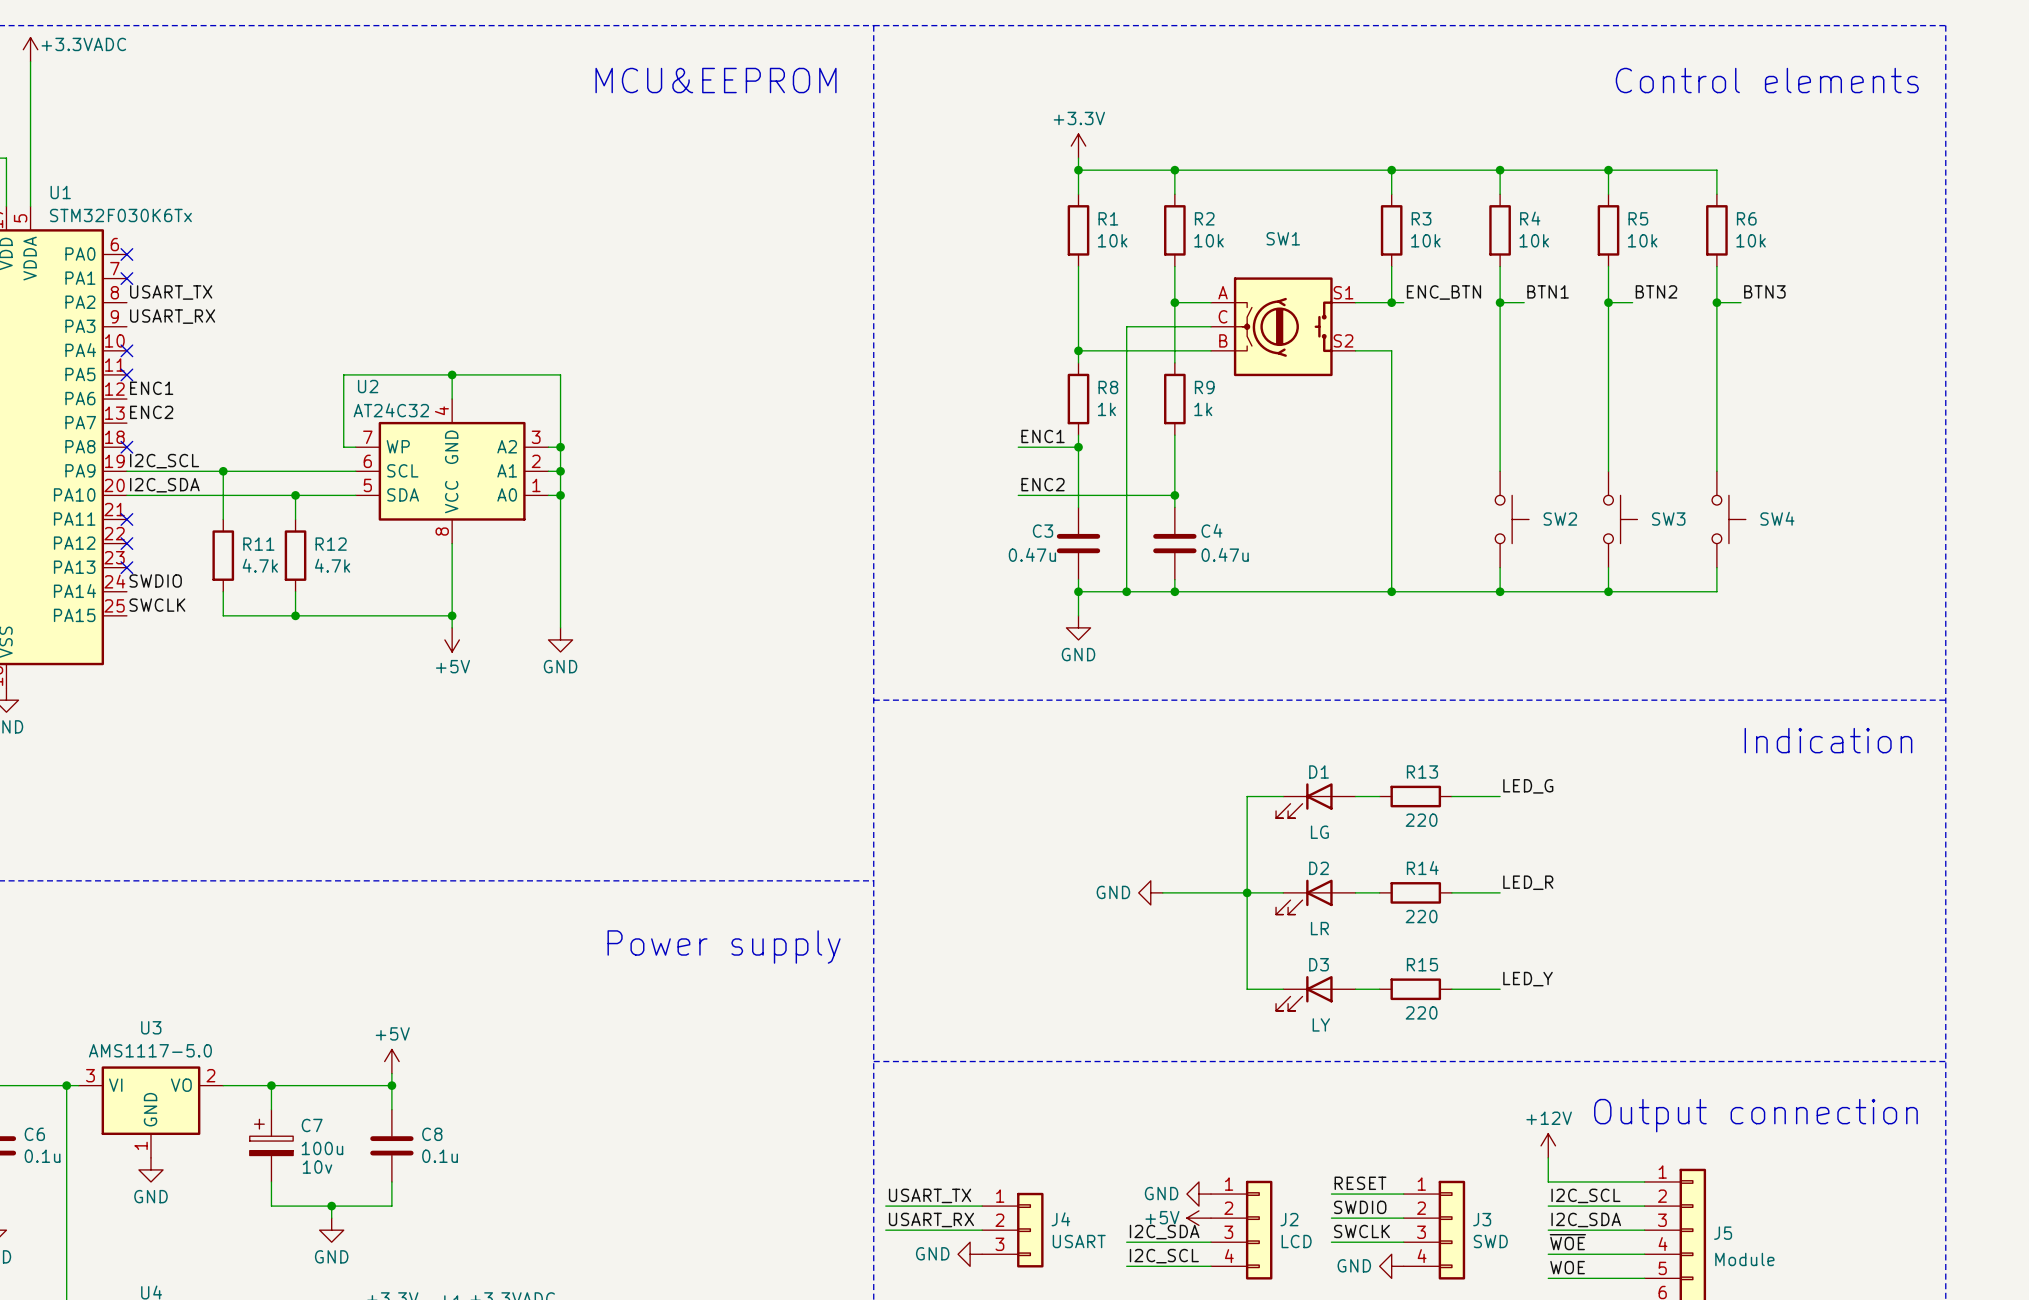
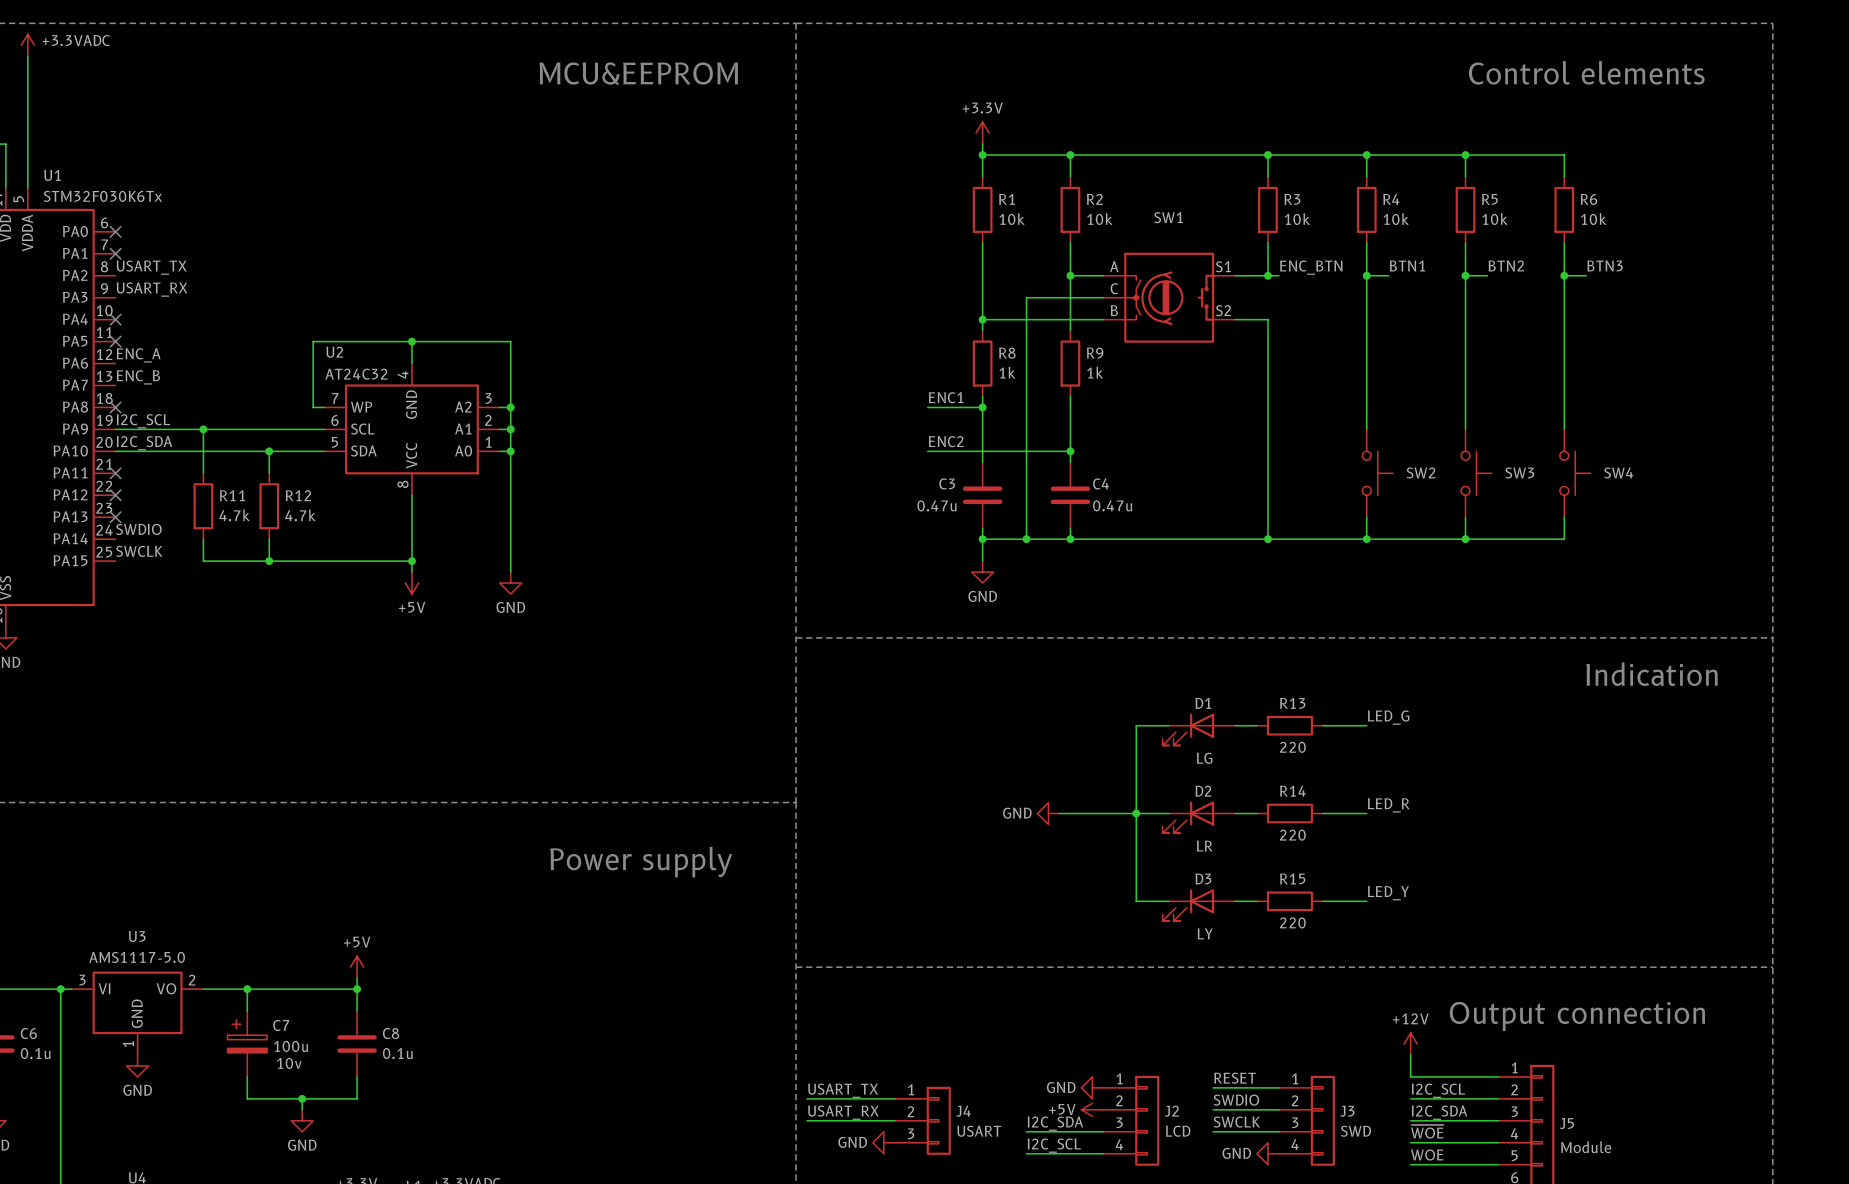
label: ENC1 (151, 388) -> ENC_A (138, 355)
label: ENC2 (151, 412) -> ENC_B (138, 377)

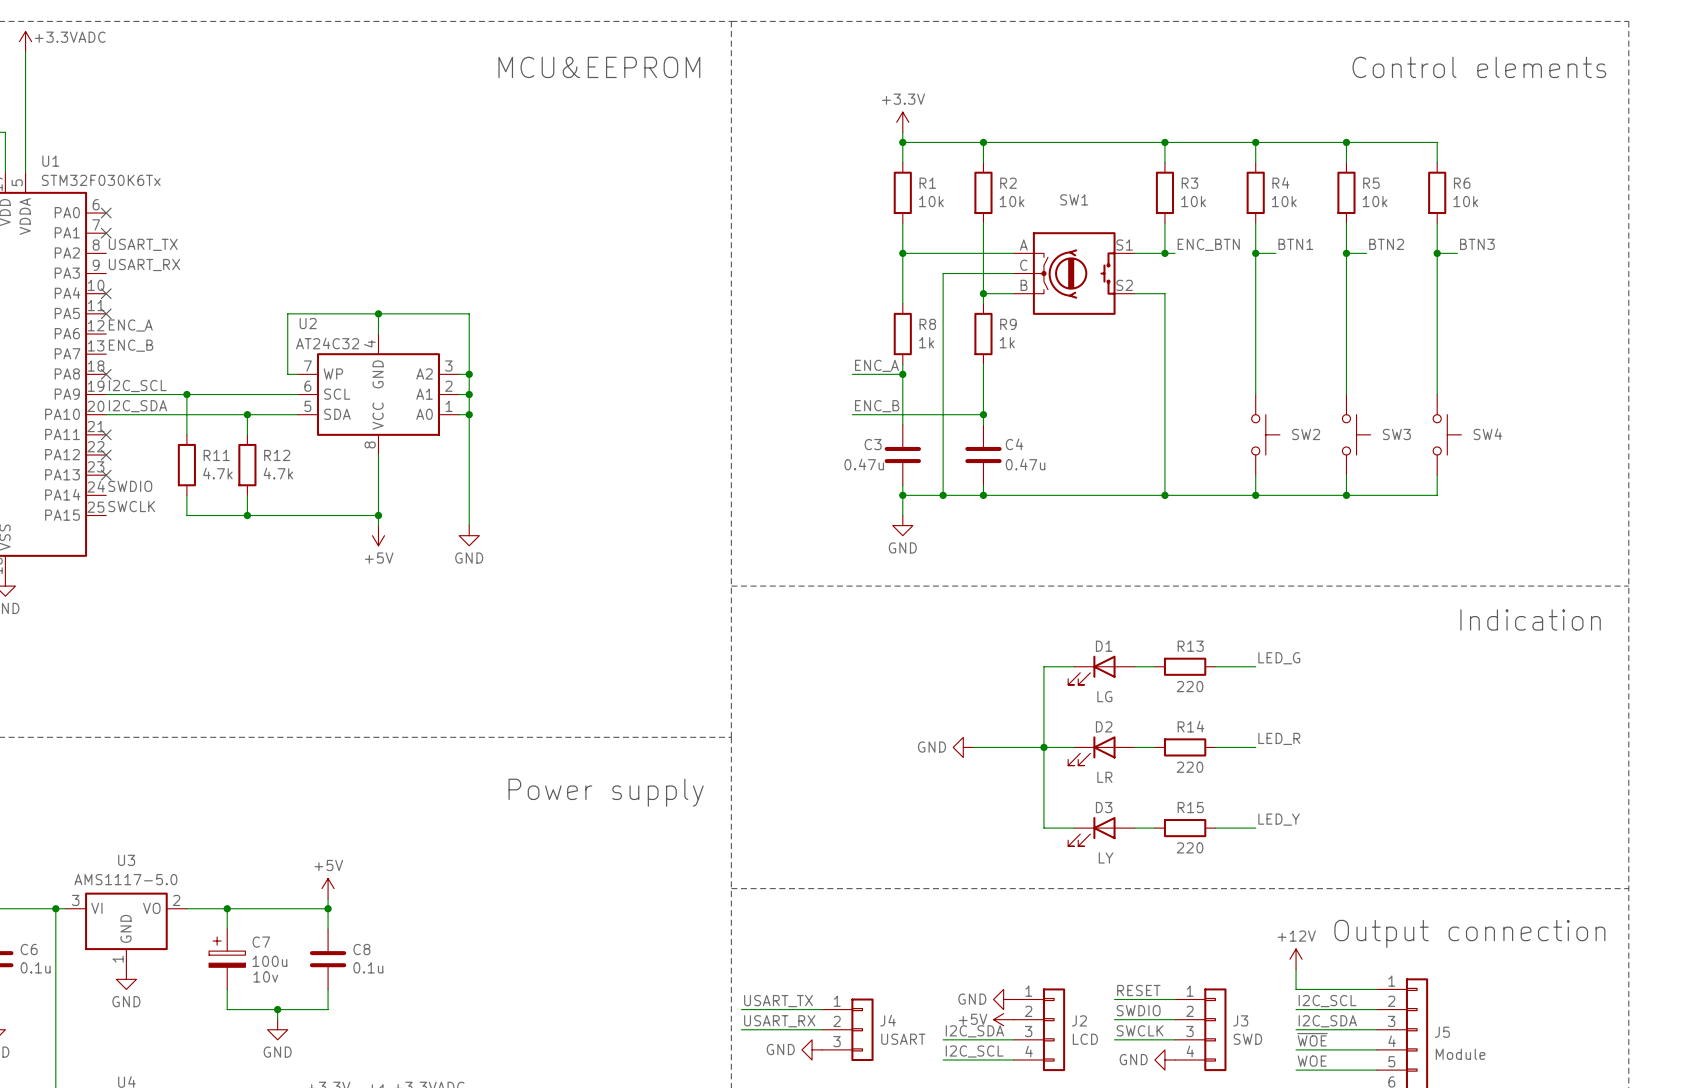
junction: none -> (902, 253)
junction: (1070, 275) -> none
wire: (982, 319) (1070, 319) -> (902, 253) (983, 253)
junction: (982, 319) -> none
junction: none -> (983, 293)
label: ENC1 (946, 397) -> ENC_A (876, 365)
label: ENC2 (946, 441) -> ENC_B (877, 406)

